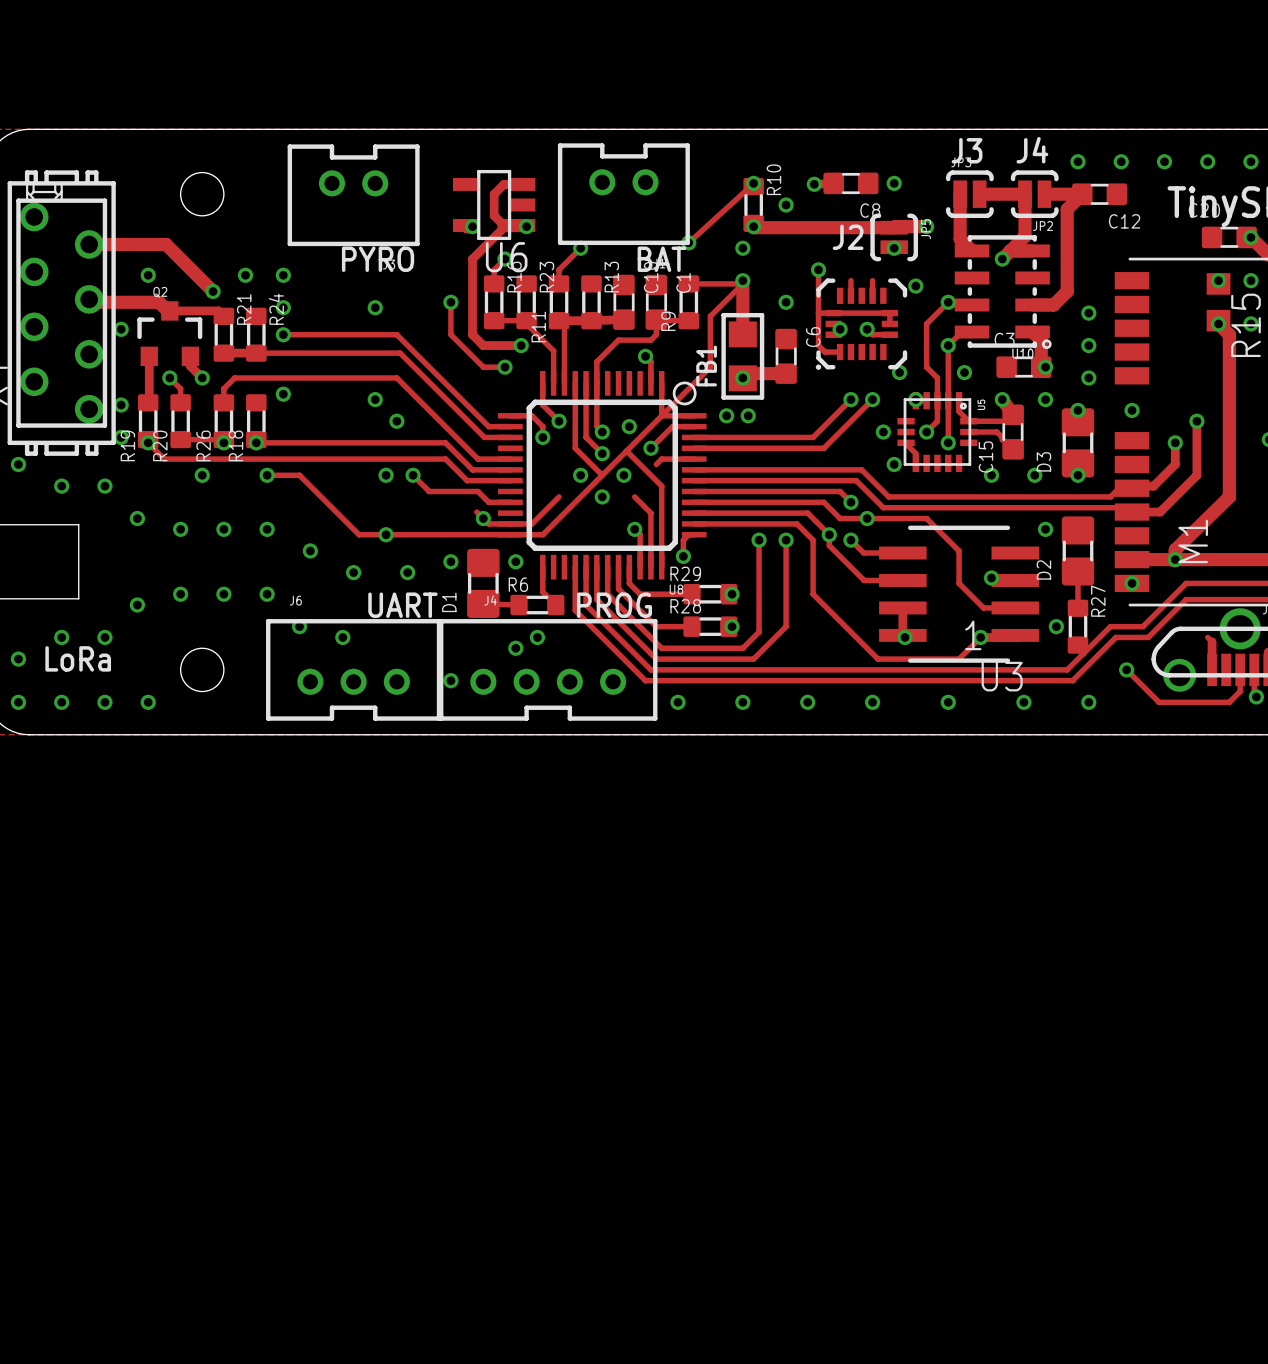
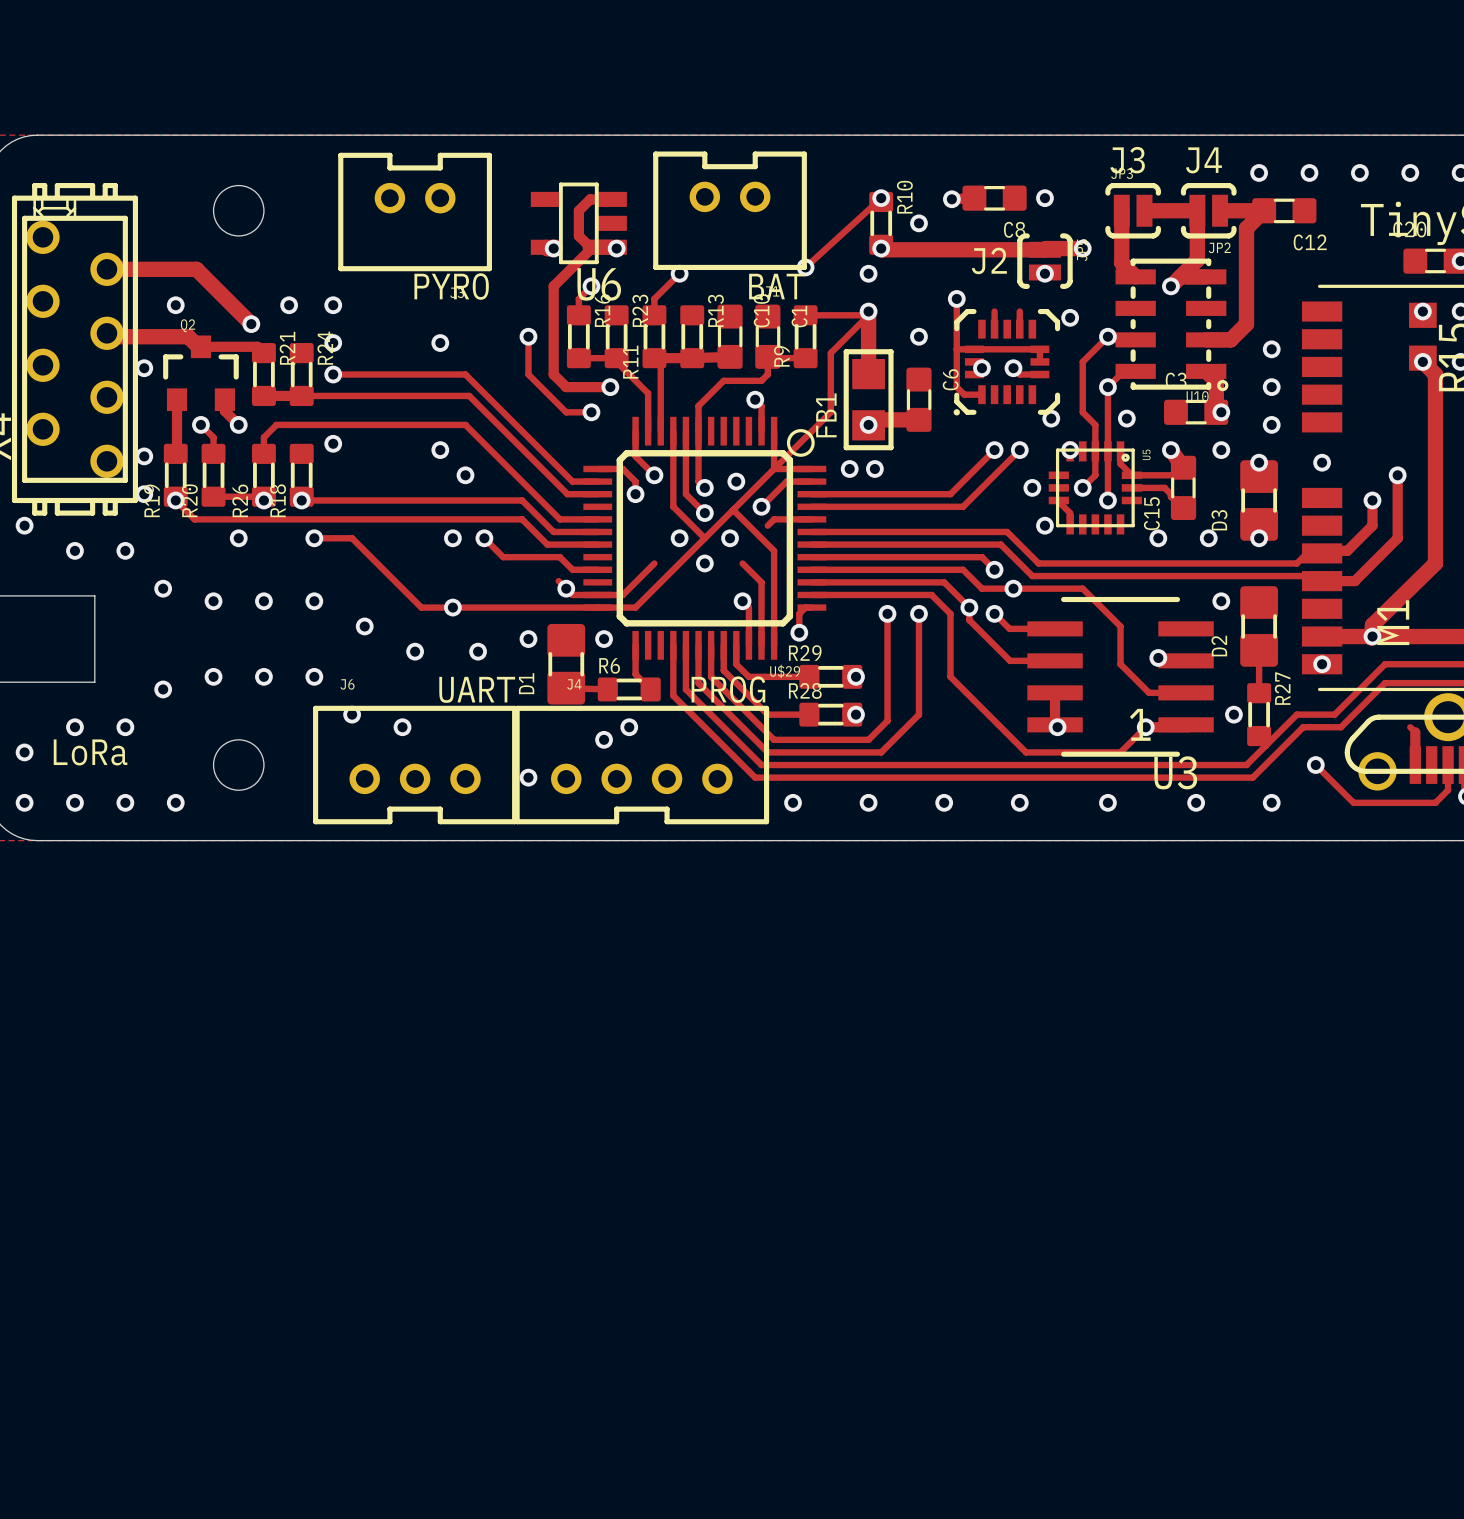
U8 name: U8 (676, 589) -> U$29 (785, 671)

